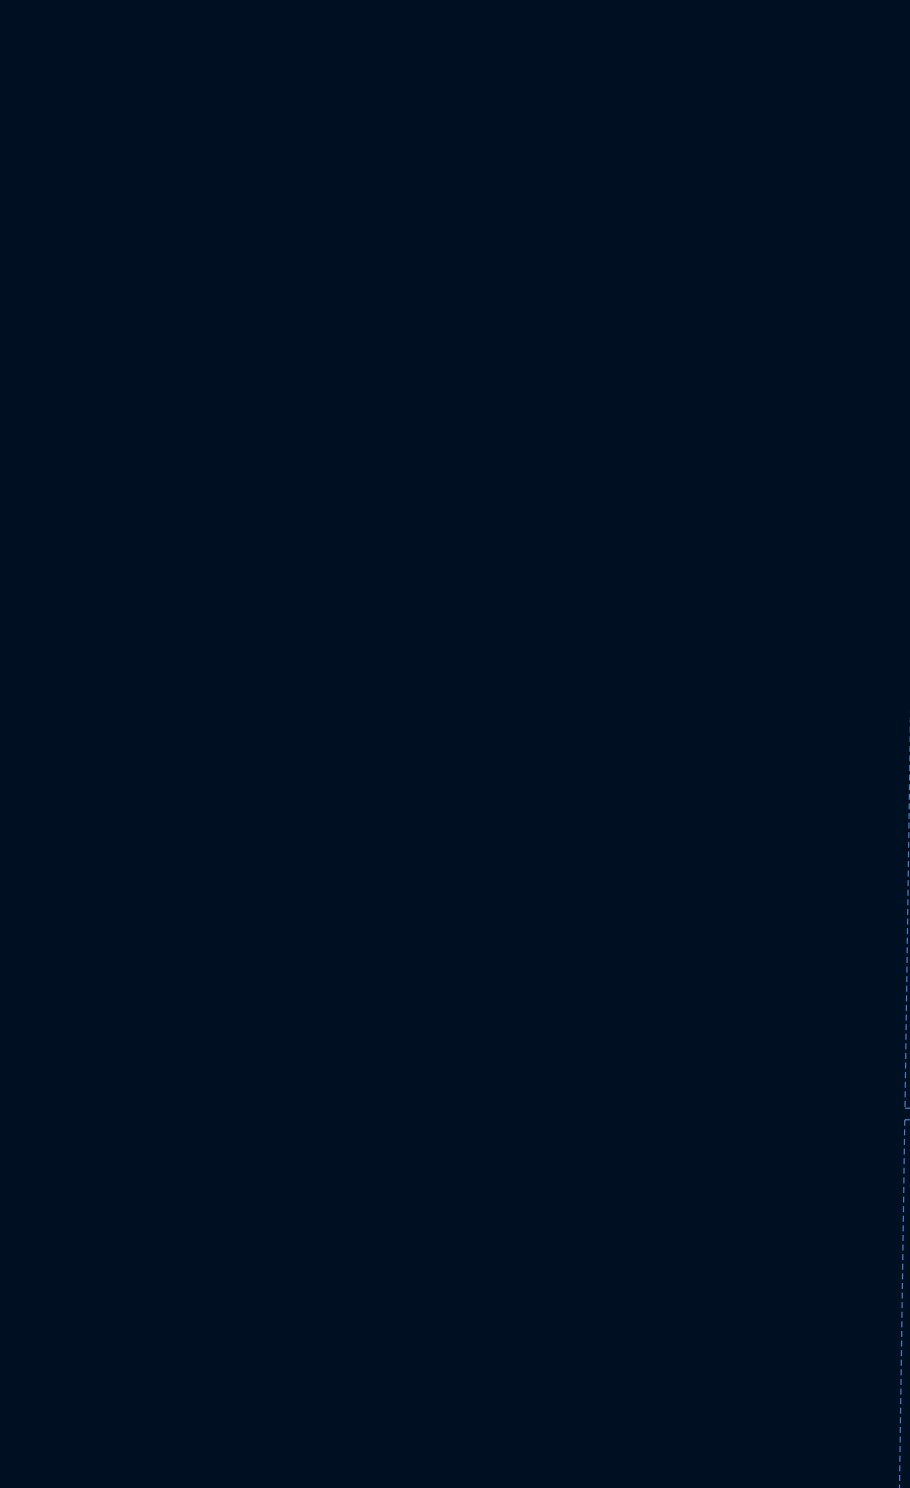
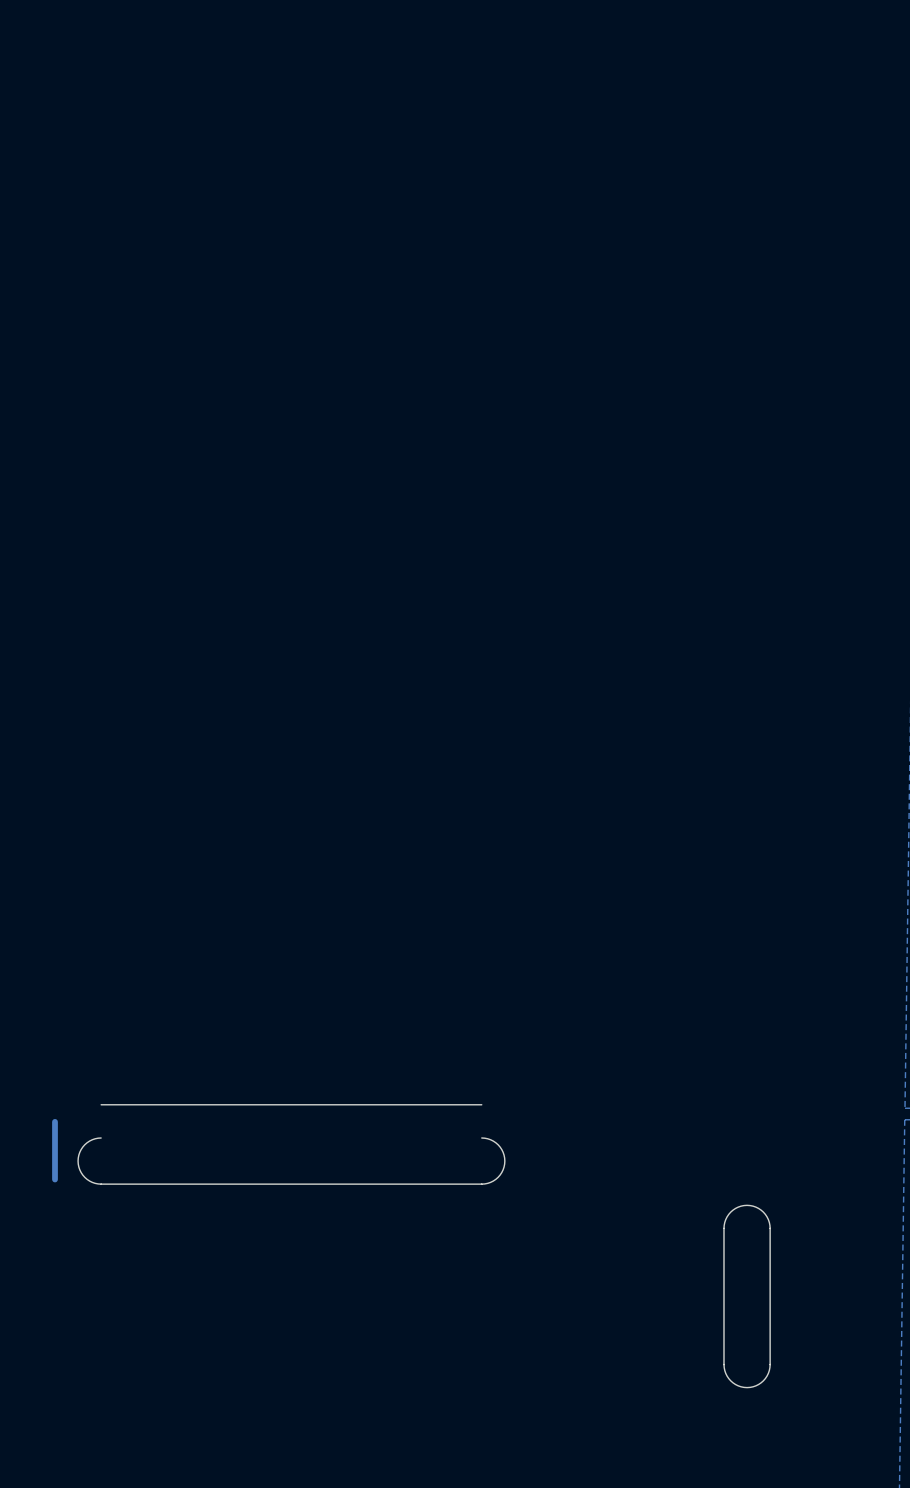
board edge: none -> (481, 1104) (101, 1104)
bottom track: none -> (55, 1121) (55, 1179)
board edge: none -> (481, 1138) (490, 1139) (498, 1144) (503, 1152) (504, 1161) (503, 1169) (498, 1177) (490, 1182) (481, 1184) (98, 1183) (89, 1181) (82, 1175) (78, 1167) (78, 1158) (84, 1144) (92, 1139) (101, 1138)
board edge: none -> (770, 1228) (769, 1367) (767, 1376) (761, 1382) (753, 1386) (744, 1387) (730, 1380) (724, 1367) (724, 1225) (730, 1212) (738, 1207) (747, 1205) (755, 1207) (763, 1212) (768, 1219) (770, 1228)

